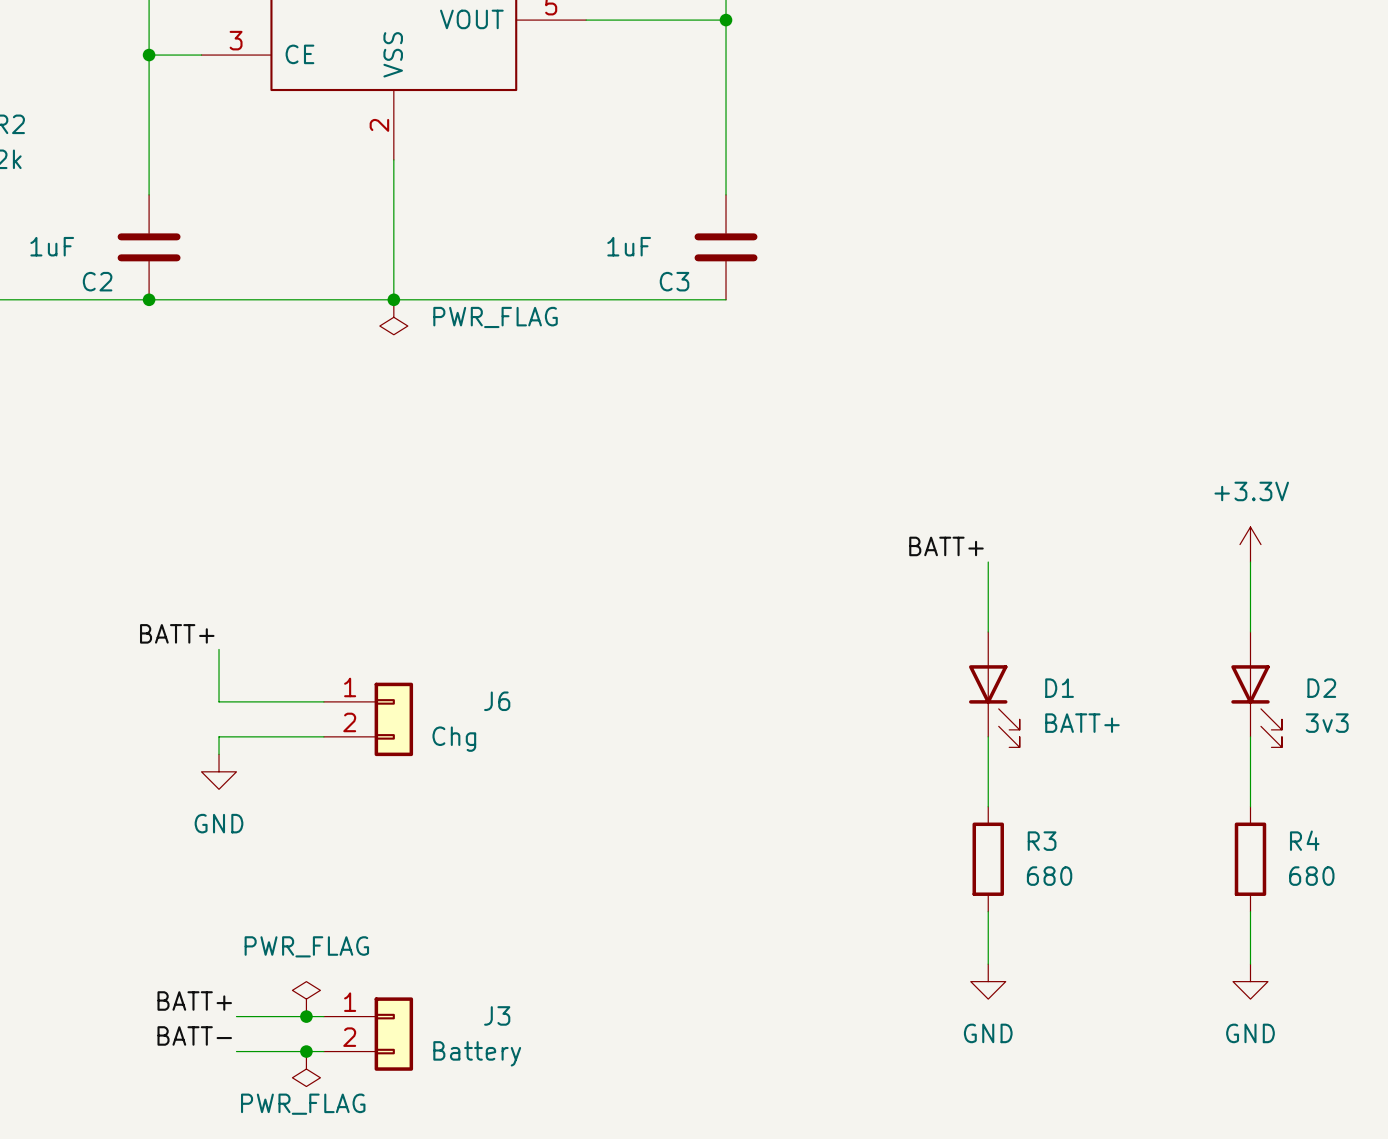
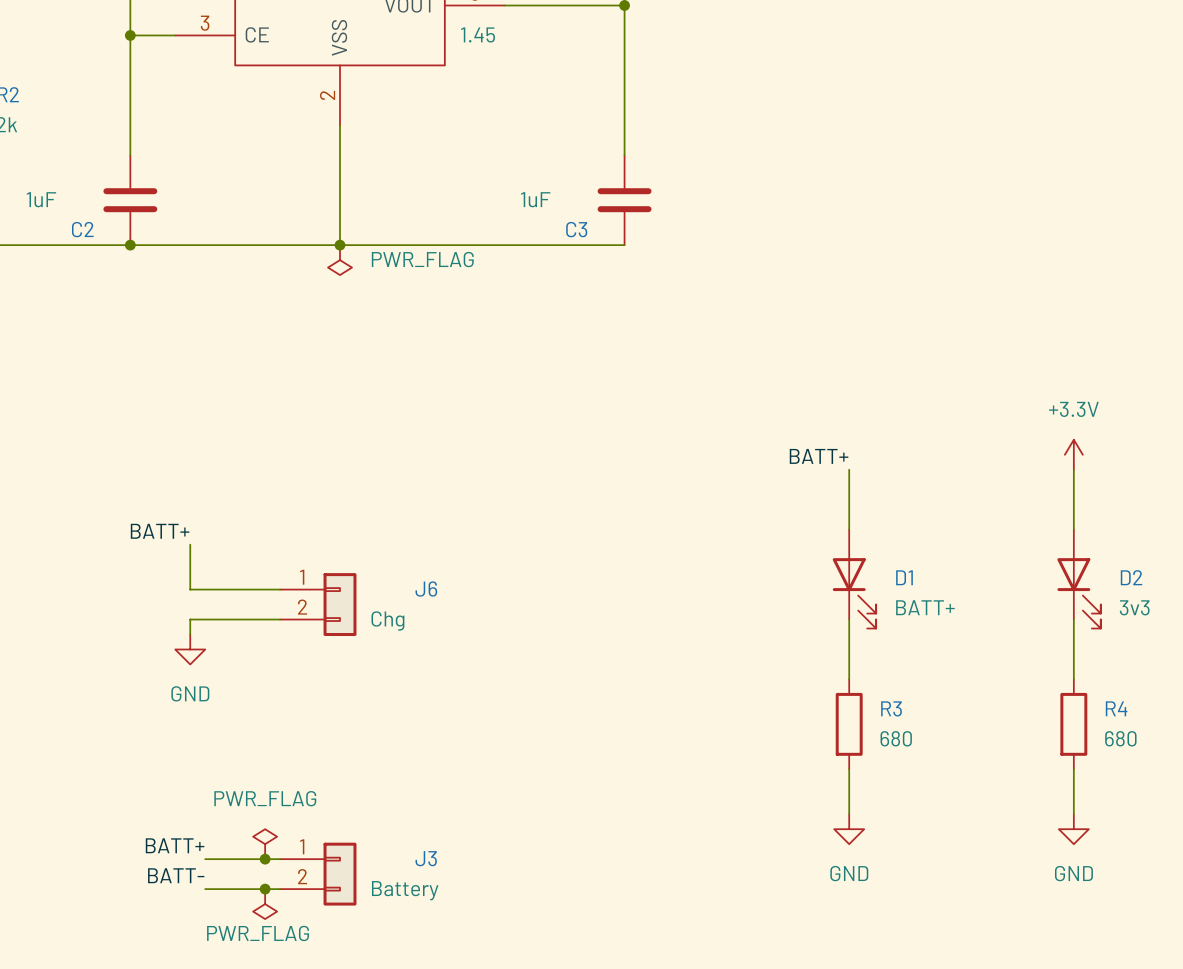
part text: none -> 1.45 (478, 34)

